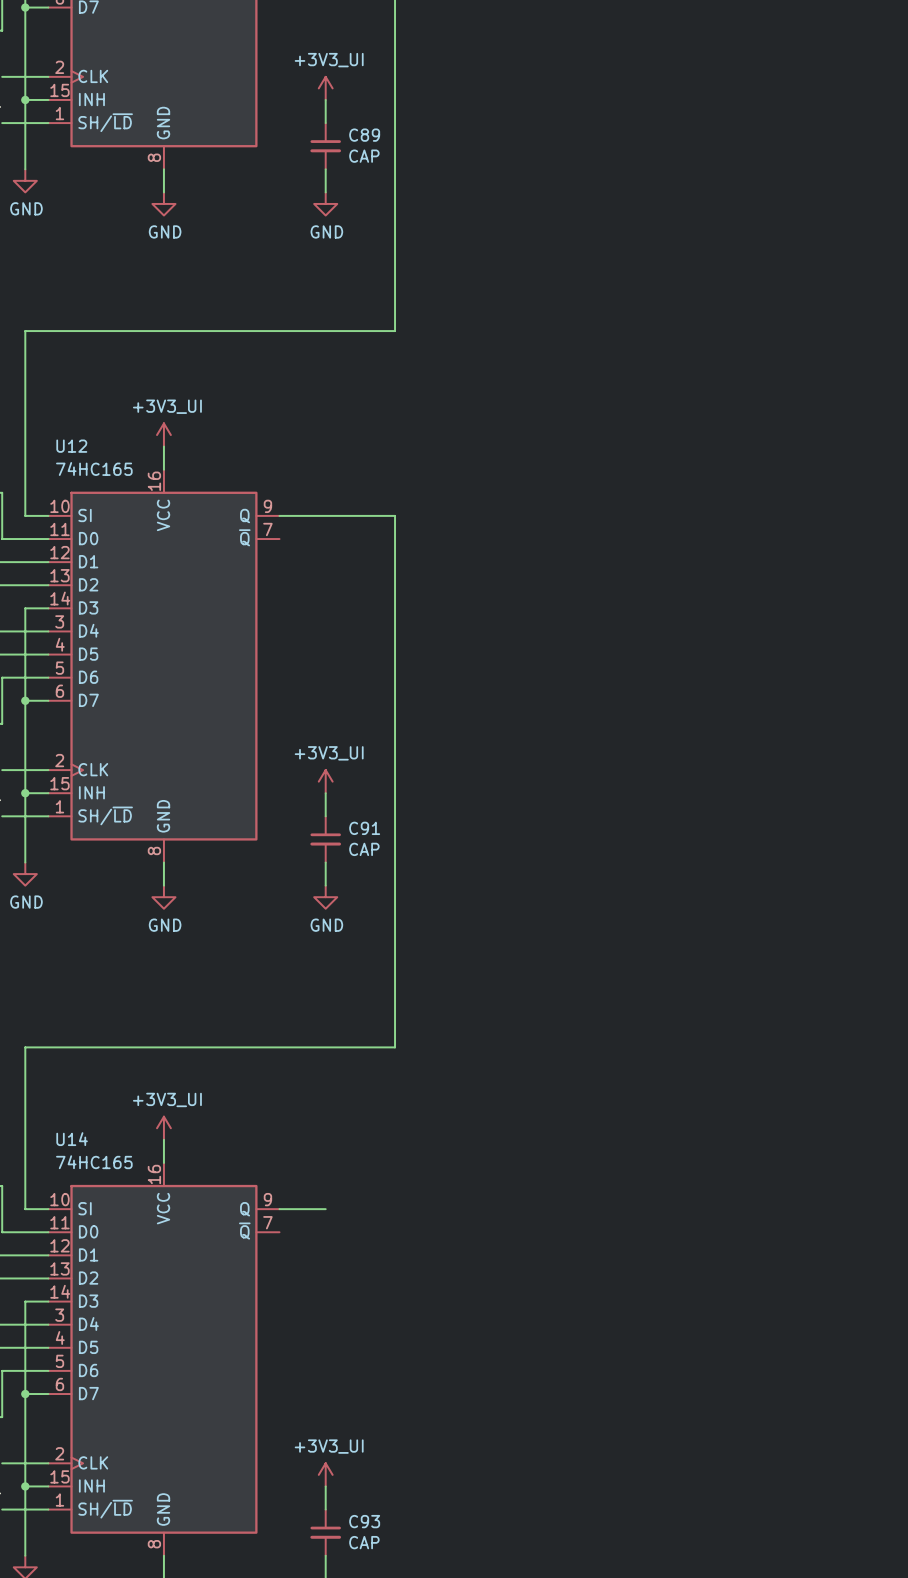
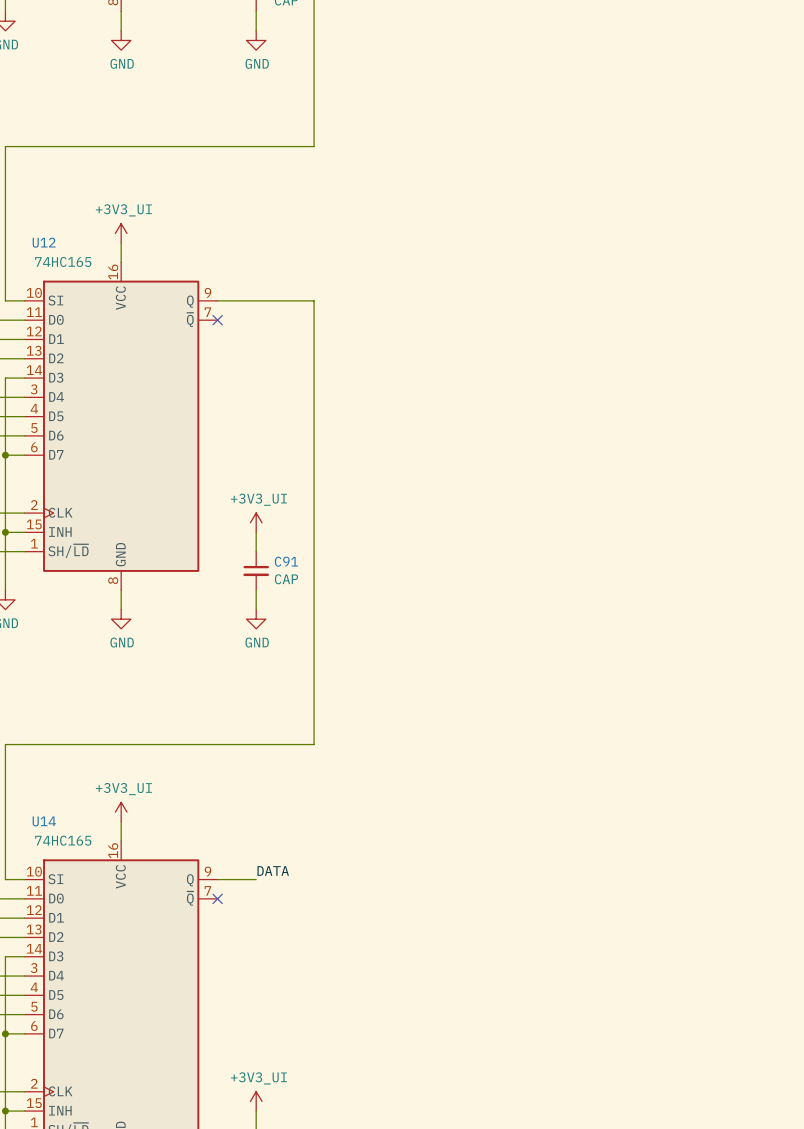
no-connect mark: none -> (217, 320)
label: none -> DATA (273, 870)
no-connect mark: none -> (217, 898)

